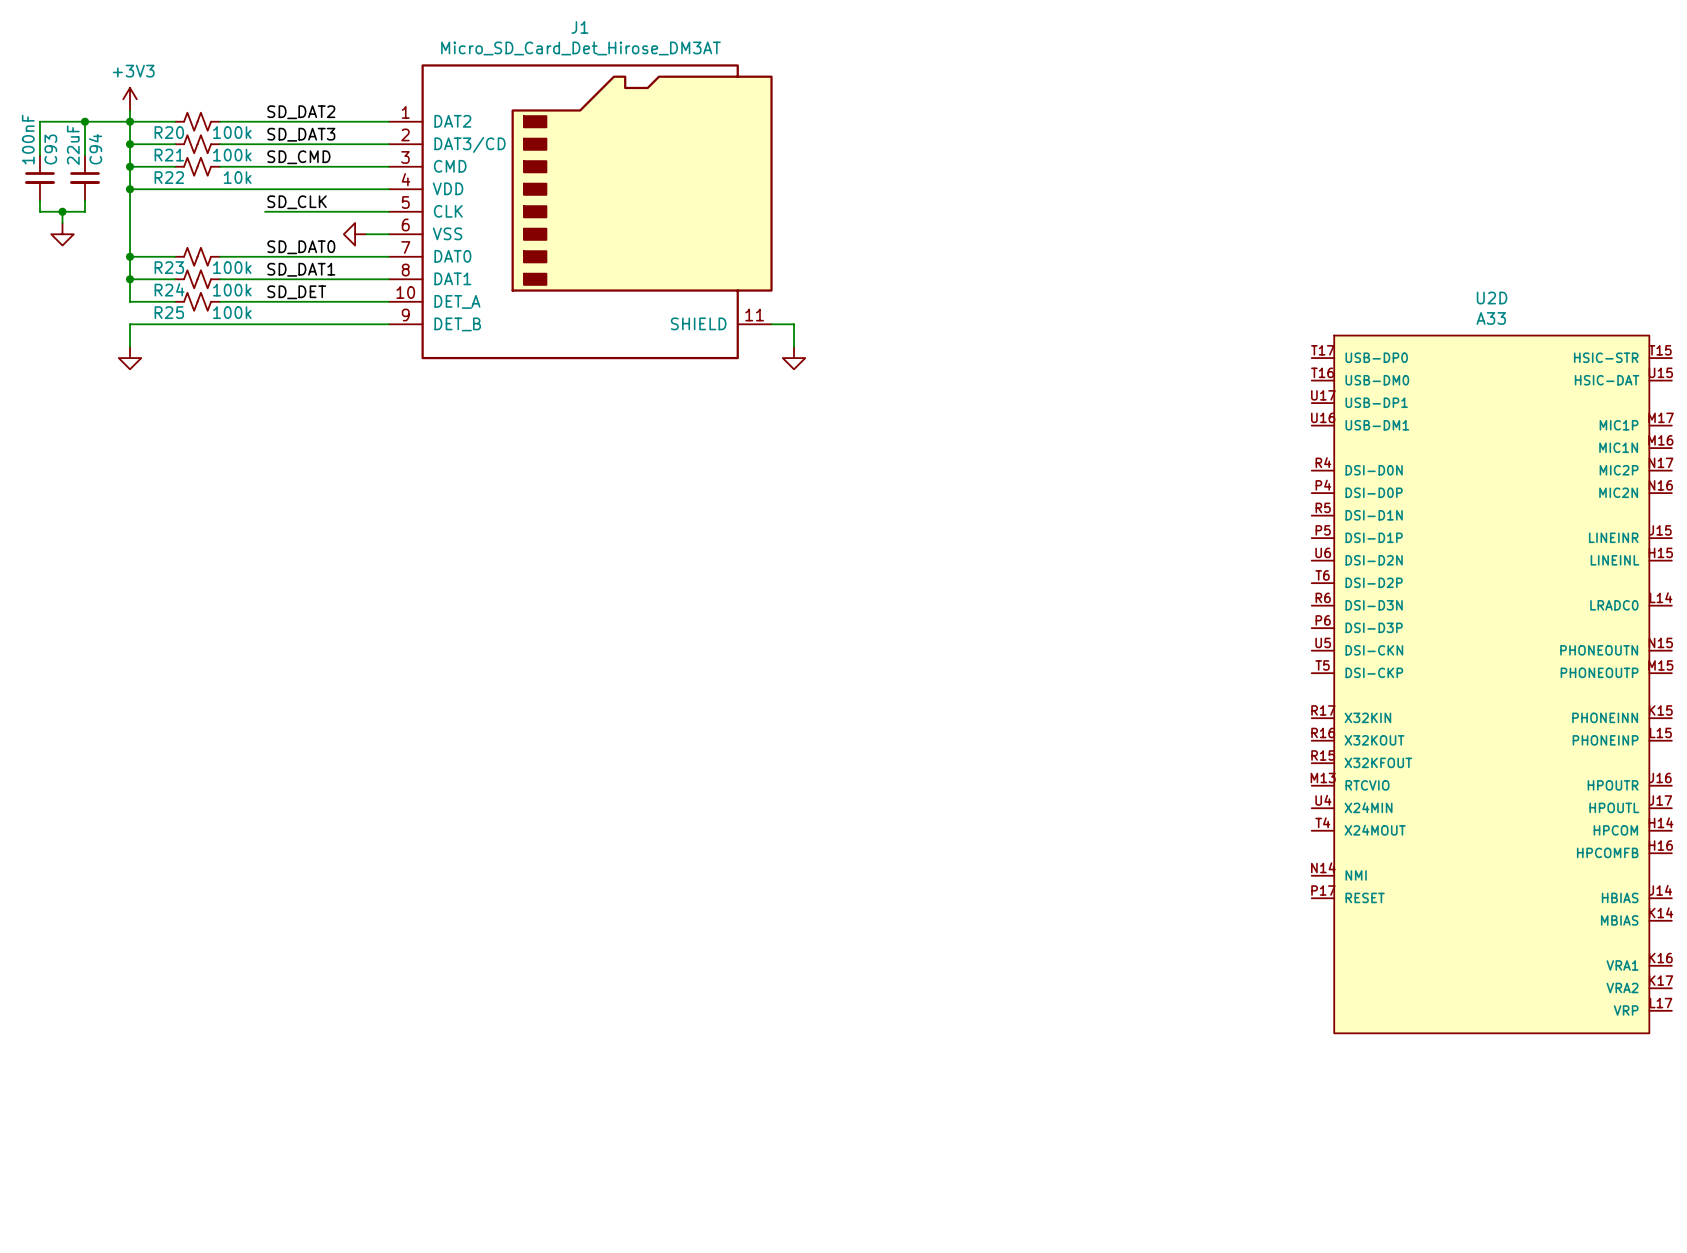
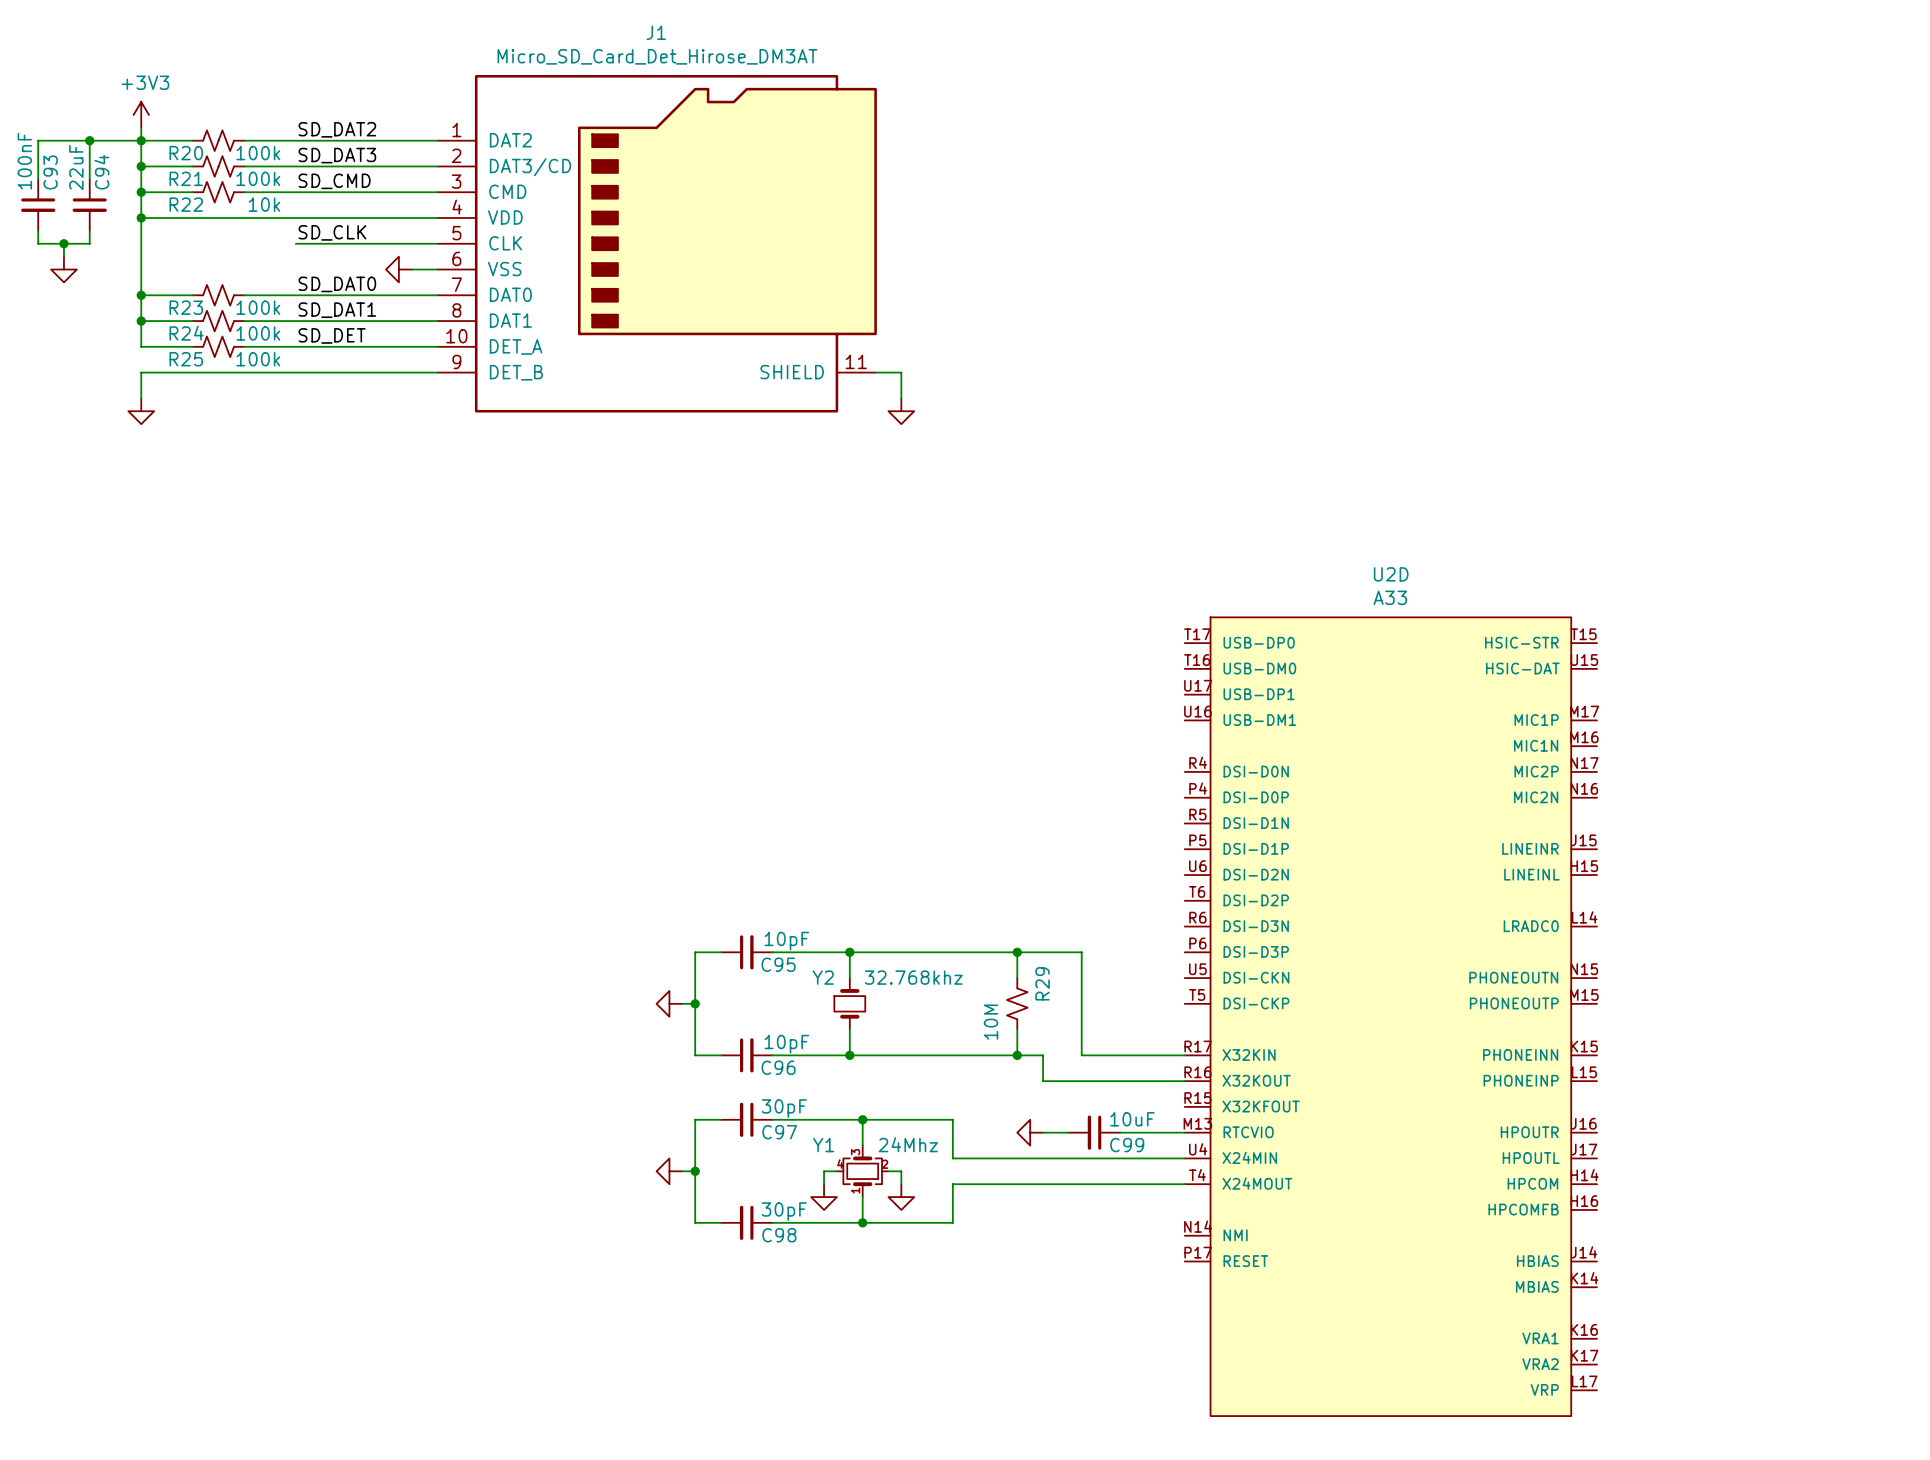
U2D position: (1491, 684) -> (1390, 1016)
wire: none -> (720, 952) (695, 952) (695, 1055) (720, 1055)
C95: none -> 10pF (746, 952)
wire: none -> (772, 952) (1081, 952) (1081, 1055) (1184, 1055)
wire: none -> (849, 952) (849, 978)
junction: none -> (849, 952)
wire: none -> (1017, 952) (1017, 978)
junction: none -> (1017, 952)
power symbol: none -> (669, 1003)
wire: none -> (682, 1003) (695, 1003)
junction: none -> (695, 1003)
Y2: none -> 32.768khz (849, 1003)
R29: none -> 10M (1017, 1003)
wire: none -> (849, 1029) (849, 1055)
wire: none -> (1017, 1029) (1017, 1055)
C96: none -> 10pF (746, 1055)
wire: none -> (772, 1055) (1043, 1055) (1043, 1081) (1184, 1081)
junction: none -> (849, 1055)
junction: none -> (1017, 1055)
wire: none -> (720, 1119) (695, 1119) (695, 1222) (720, 1222)
C97: none -> 30pF (746, 1119)
wire: none -> (772, 1119) (952, 1119) (952, 1158) (1184, 1158)
wire: none -> (862, 1119) (862, 1145)
junction: none -> (862, 1119)
power symbol: none -> (1030, 1132)
wire: none -> (1043, 1132) (1068, 1132)
C99: none -> 10uF (1094, 1132)
wire: none -> (1120, 1132) (1184, 1132)
power symbol: none -> (669, 1171)
wire: none -> (682, 1171) (695, 1171)
junction: none -> (695, 1171)
wire: none -> (836, 1171) (824, 1171) (824, 1184)
Y1: none -> 24Mhz (862, 1171)
wire: none -> (888, 1171) (901, 1171) (901, 1184)
wire: none -> (1184, 1184) (952, 1184) (952, 1222) (772, 1222)
power symbol: none -> (824, 1197)
wire: none -> (862, 1197) (862, 1222)
power symbol: none -> (901, 1197)
C98: none -> 30pF (746, 1222)
junction: none -> (862, 1222)

